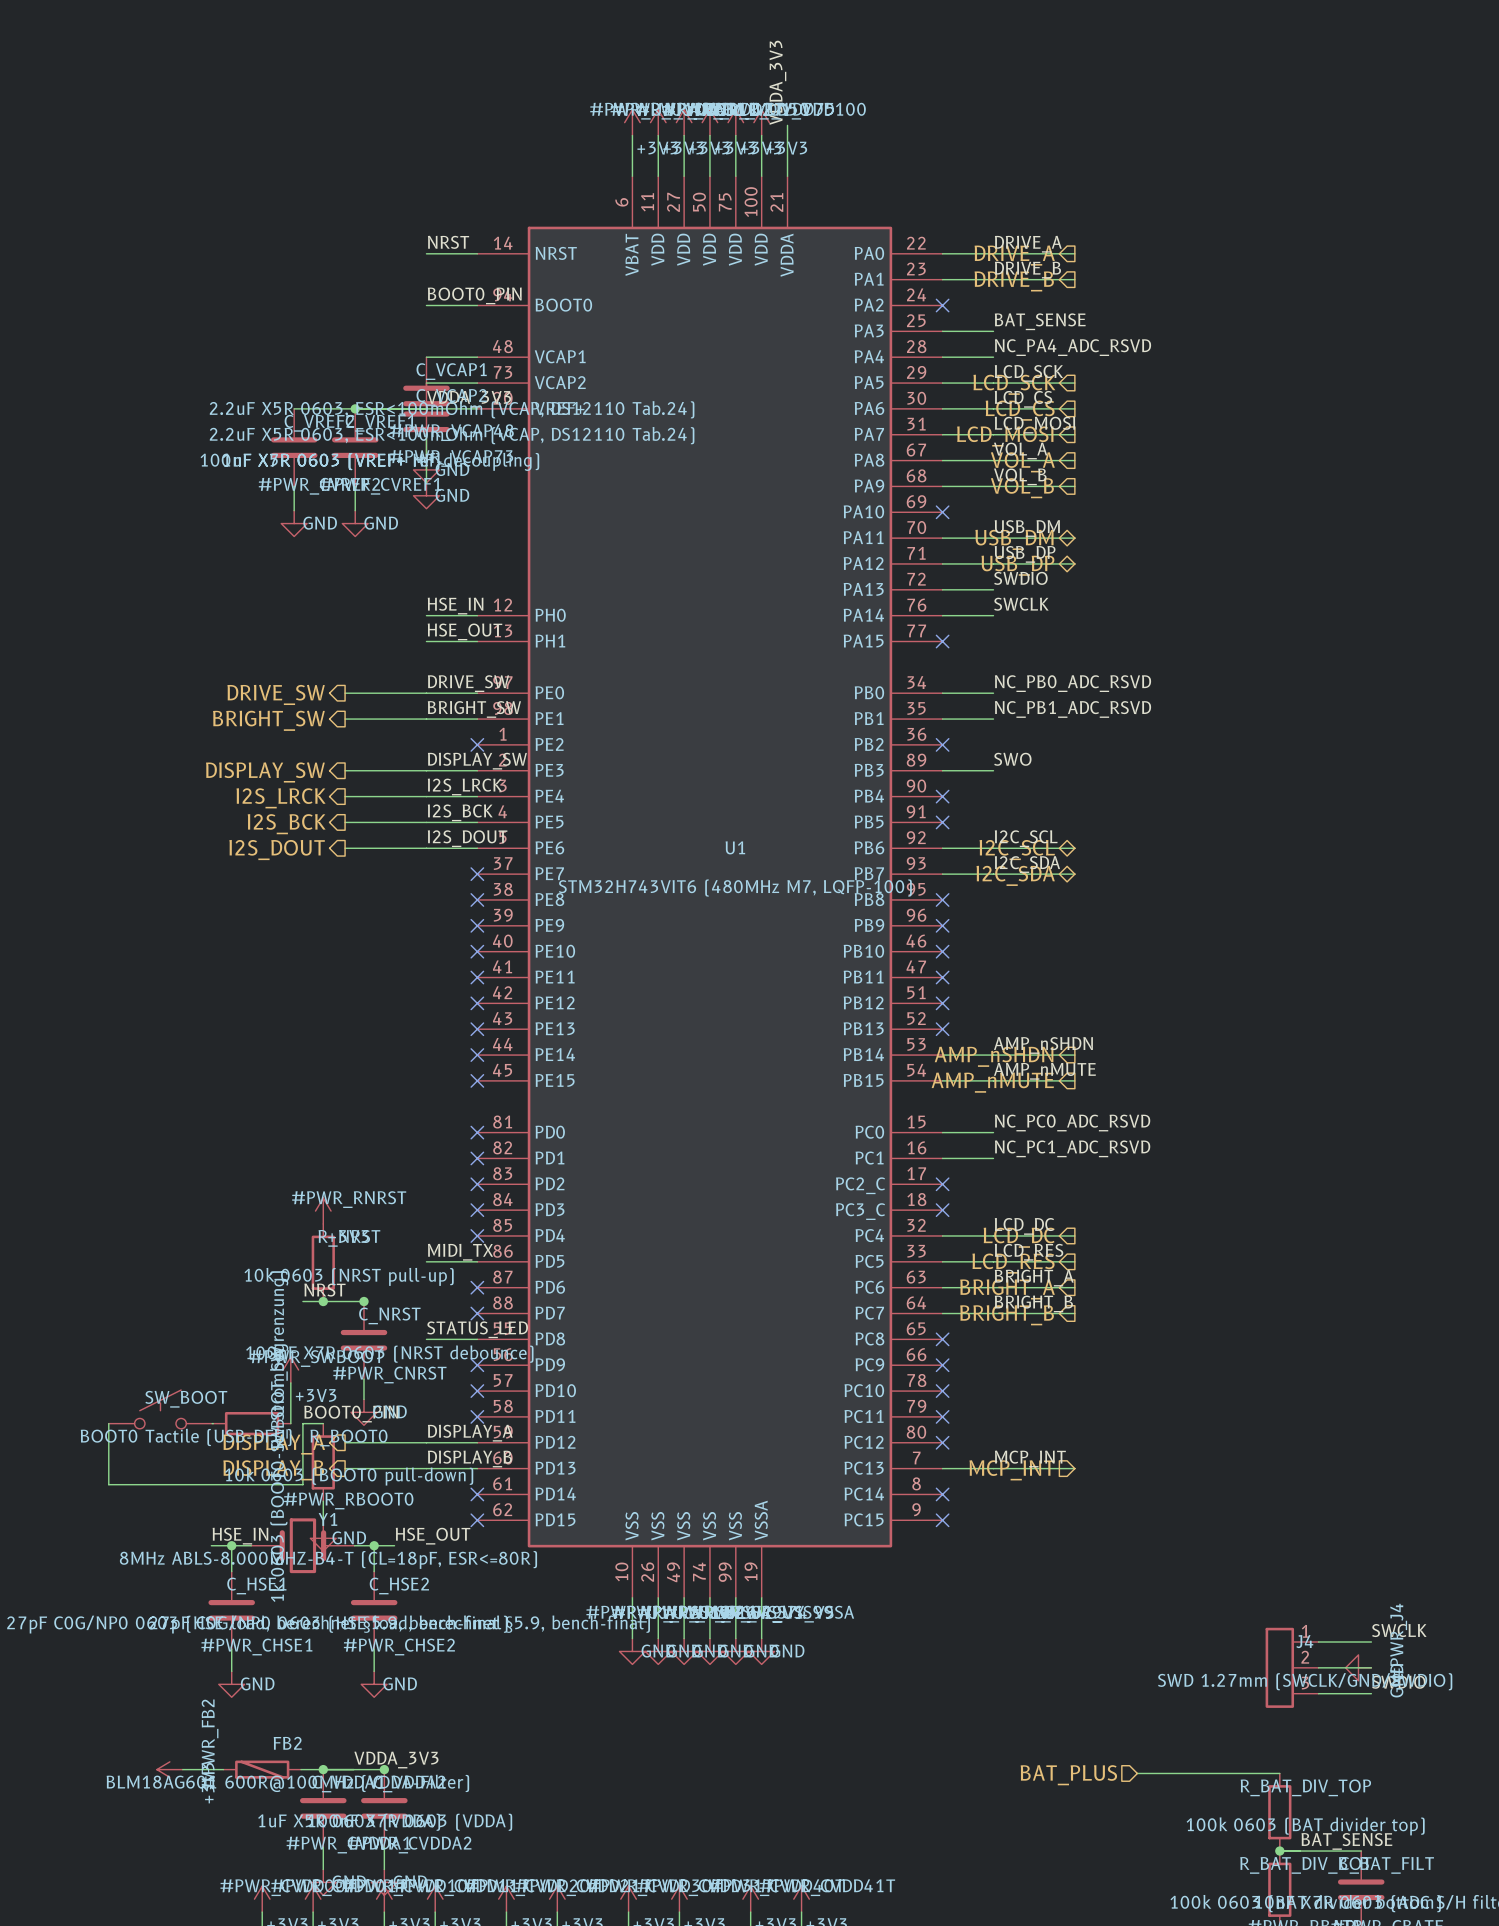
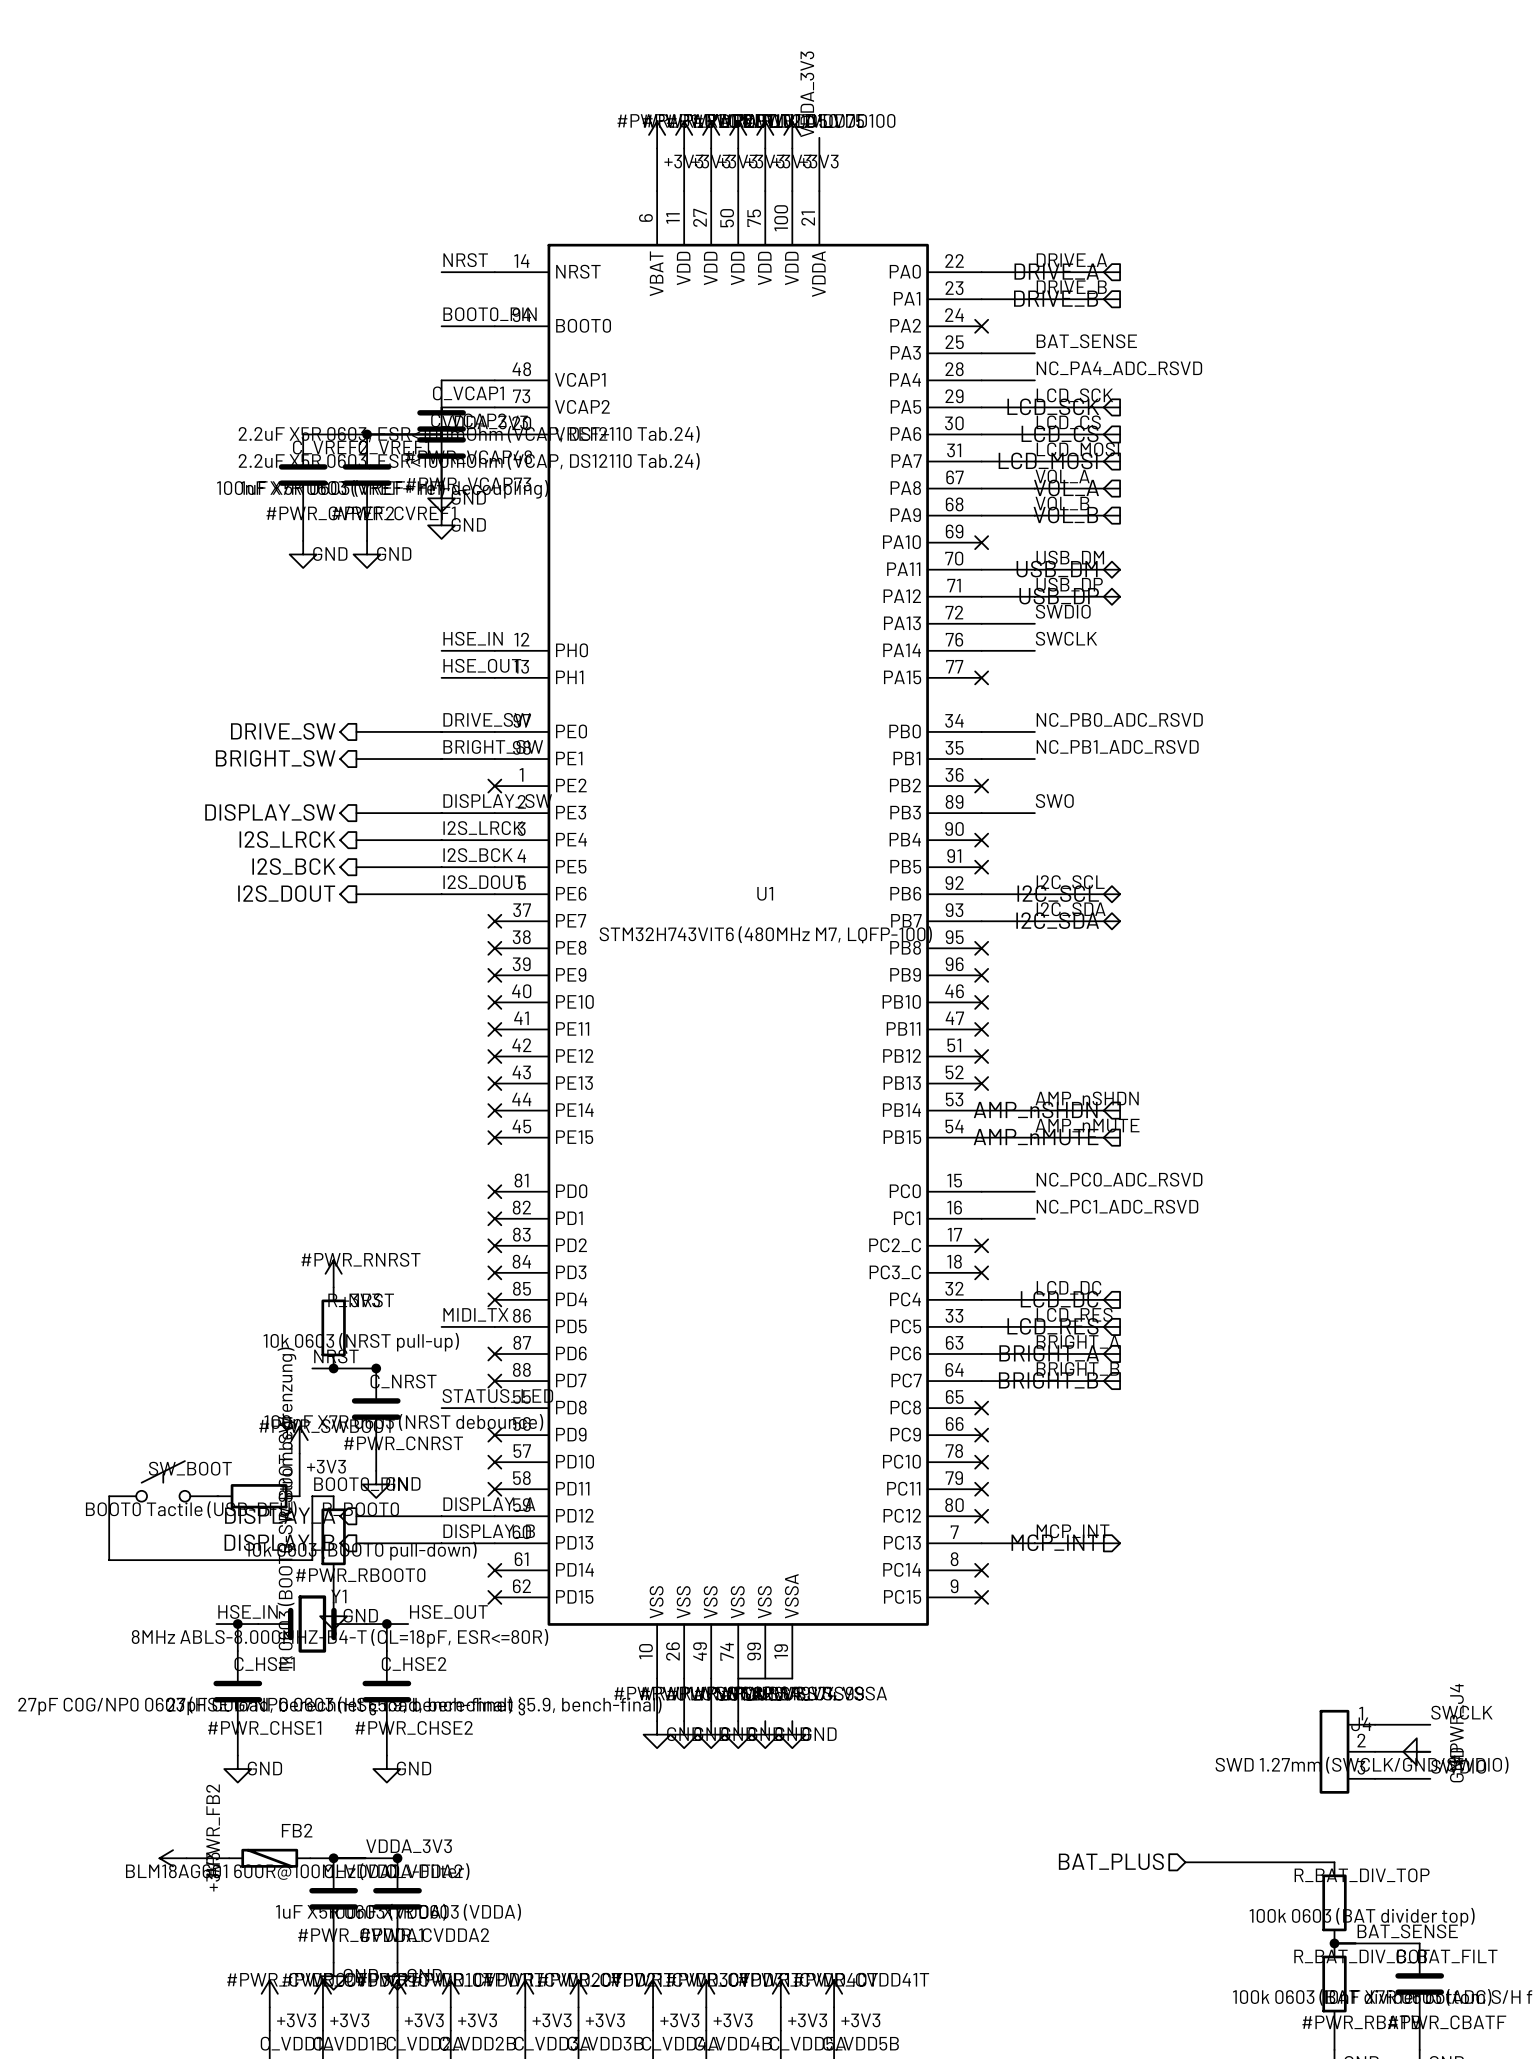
wire: (735, 1597) (735, 1638) -> none
wire: (761, 1597) (761, 1638) -> (792, 1678) (739, 1678)

